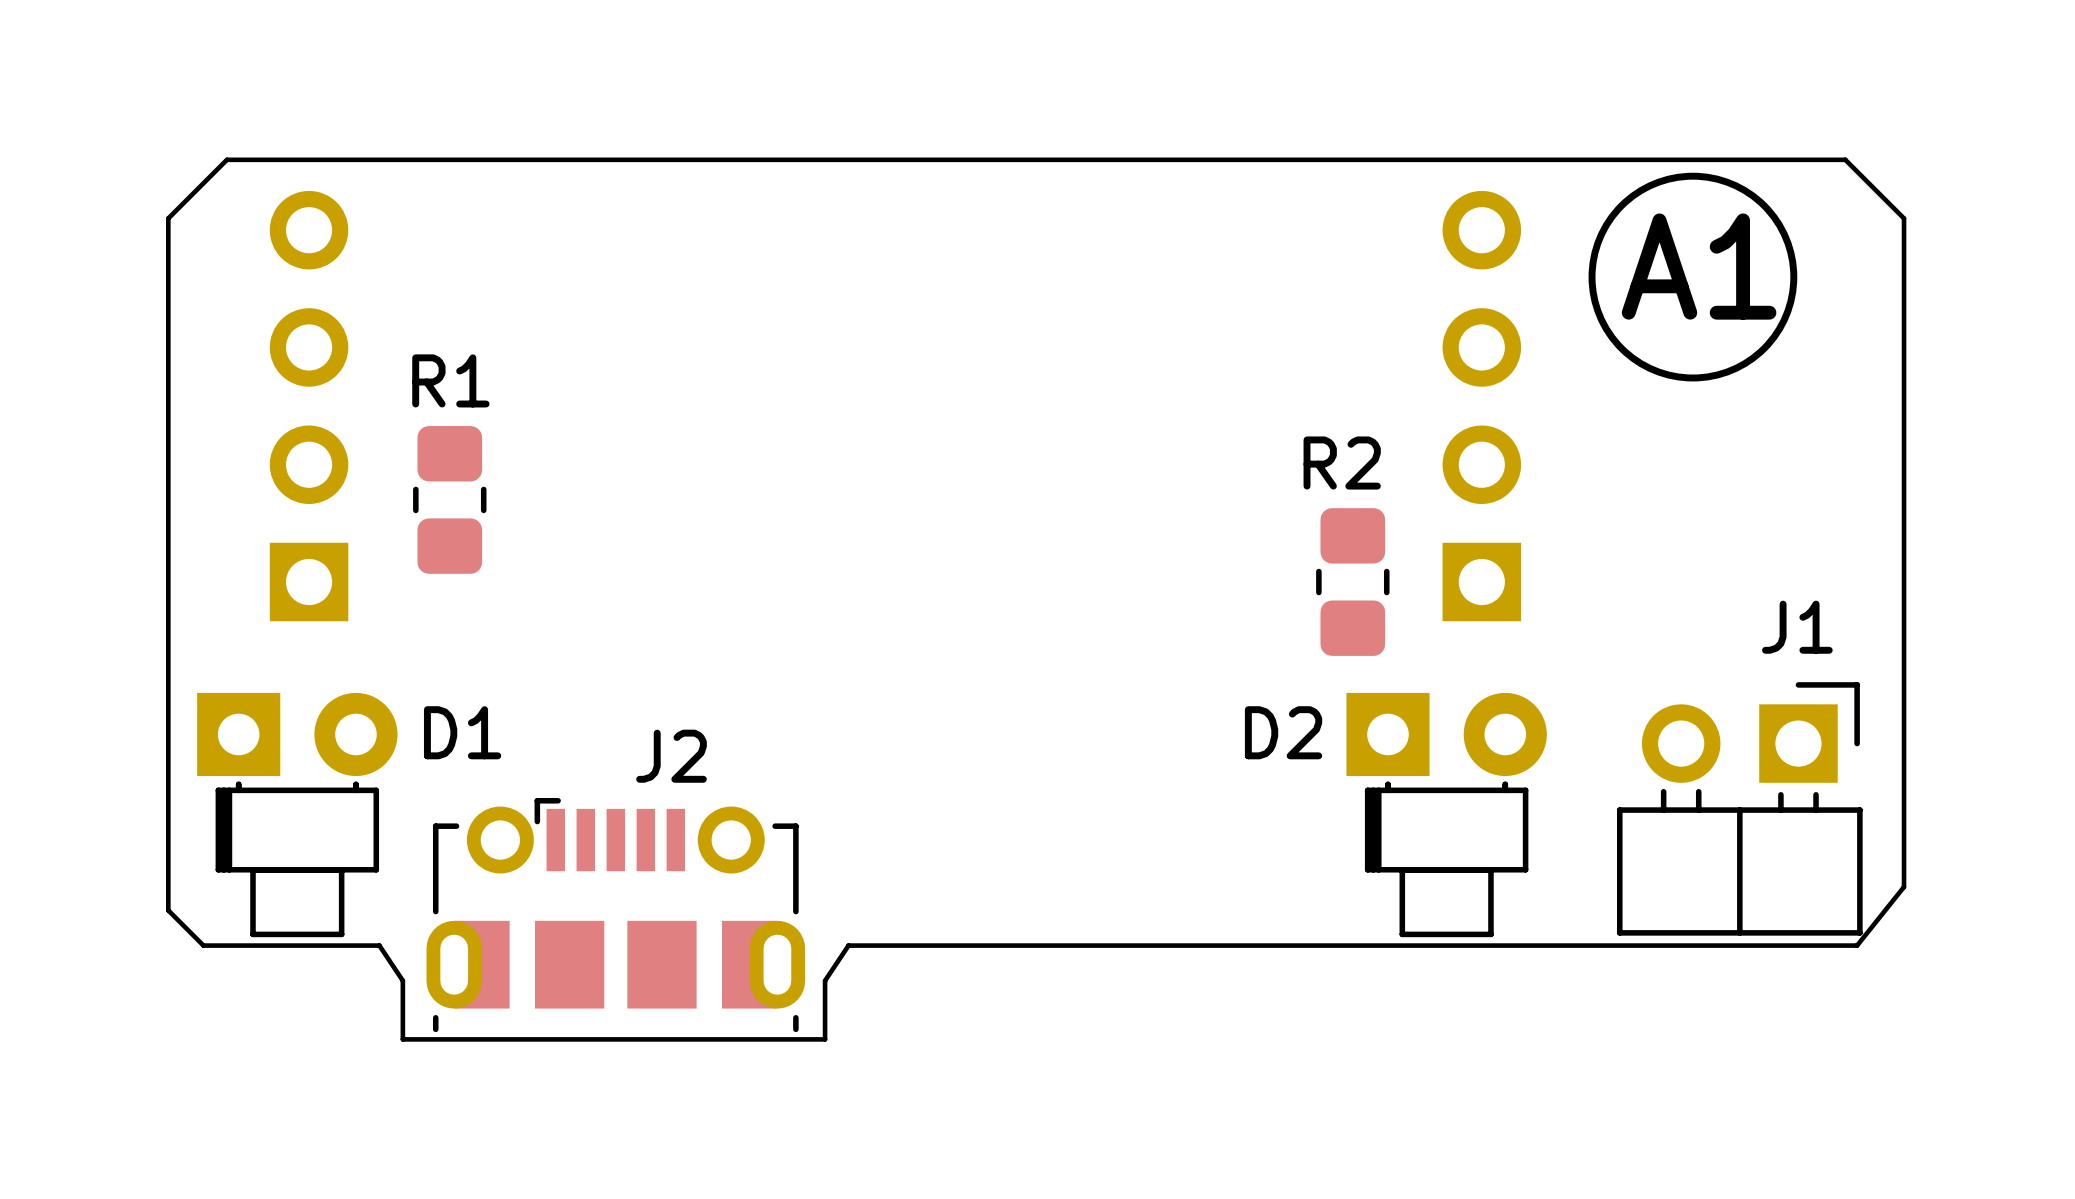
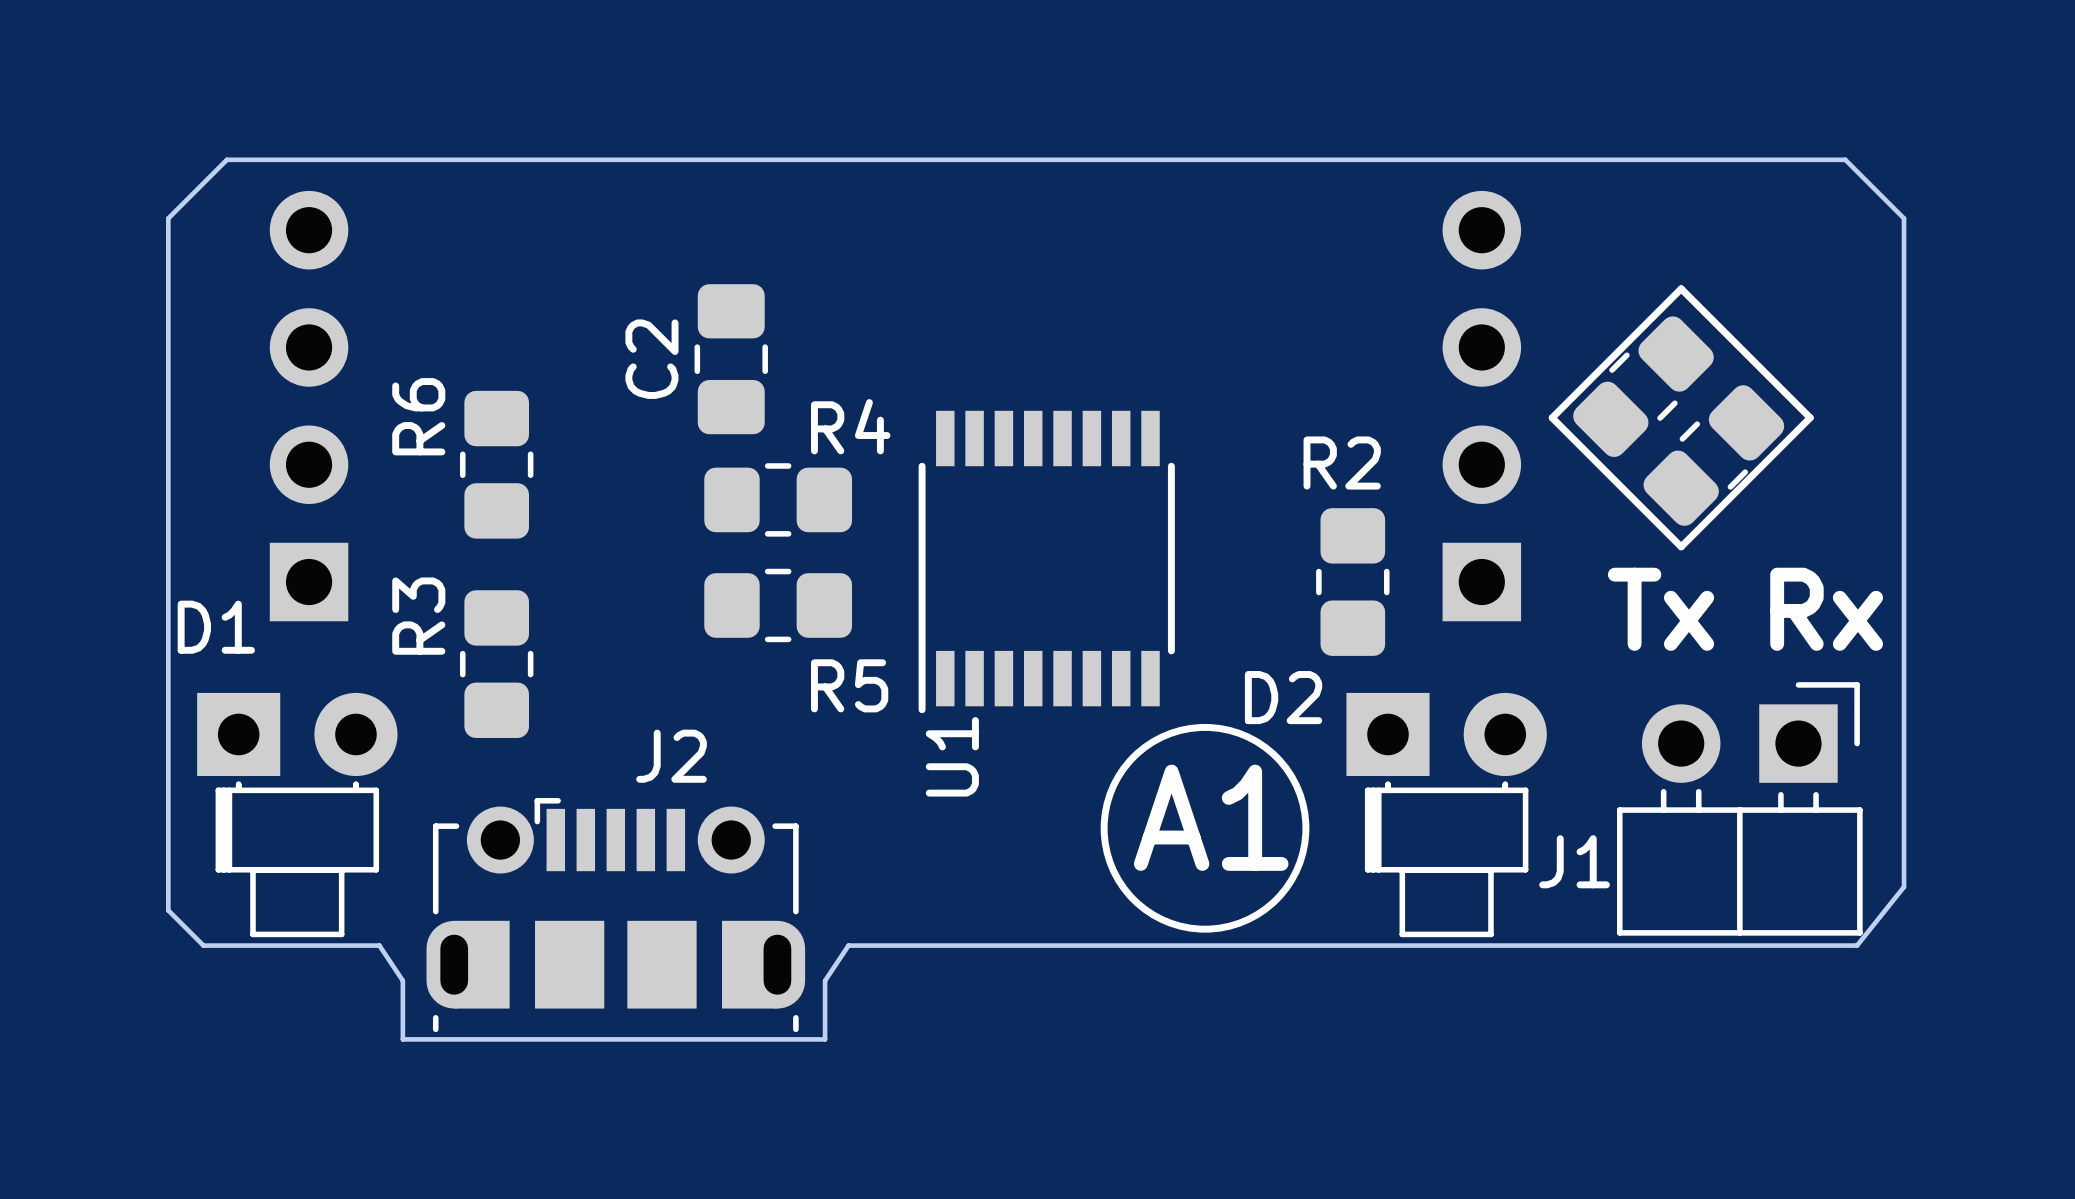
text position: A1 (1699, 266) -> A1 (1211, 817)
drawing position: (1692, 277) -> (1205, 828)
line: none -> (1681, 288) (1552, 417) (1681, 546) (1810, 417) (1681, 288)
C2: none -> (731, 359)
part: none -> (1643, 386)
part: none -> (1713, 455)
R6: none -> (496, 464)
R1: (449, 499) -> none
R4: none -> (778, 499)
U1: none -> (1046, 562)
R5: none -> (778, 605)
text: none -> Tx (1660, 609)
text: none -> Rx (1826, 609)
J1 name position: J1 (1797, 627) -> J1 (1574, 861)
R3: none -> (496, 664)
D1 name position: D1 (462, 732) -> D1 (216, 627)
D2 name position: D2 (1283, 732) -> D2 (1283, 697)

